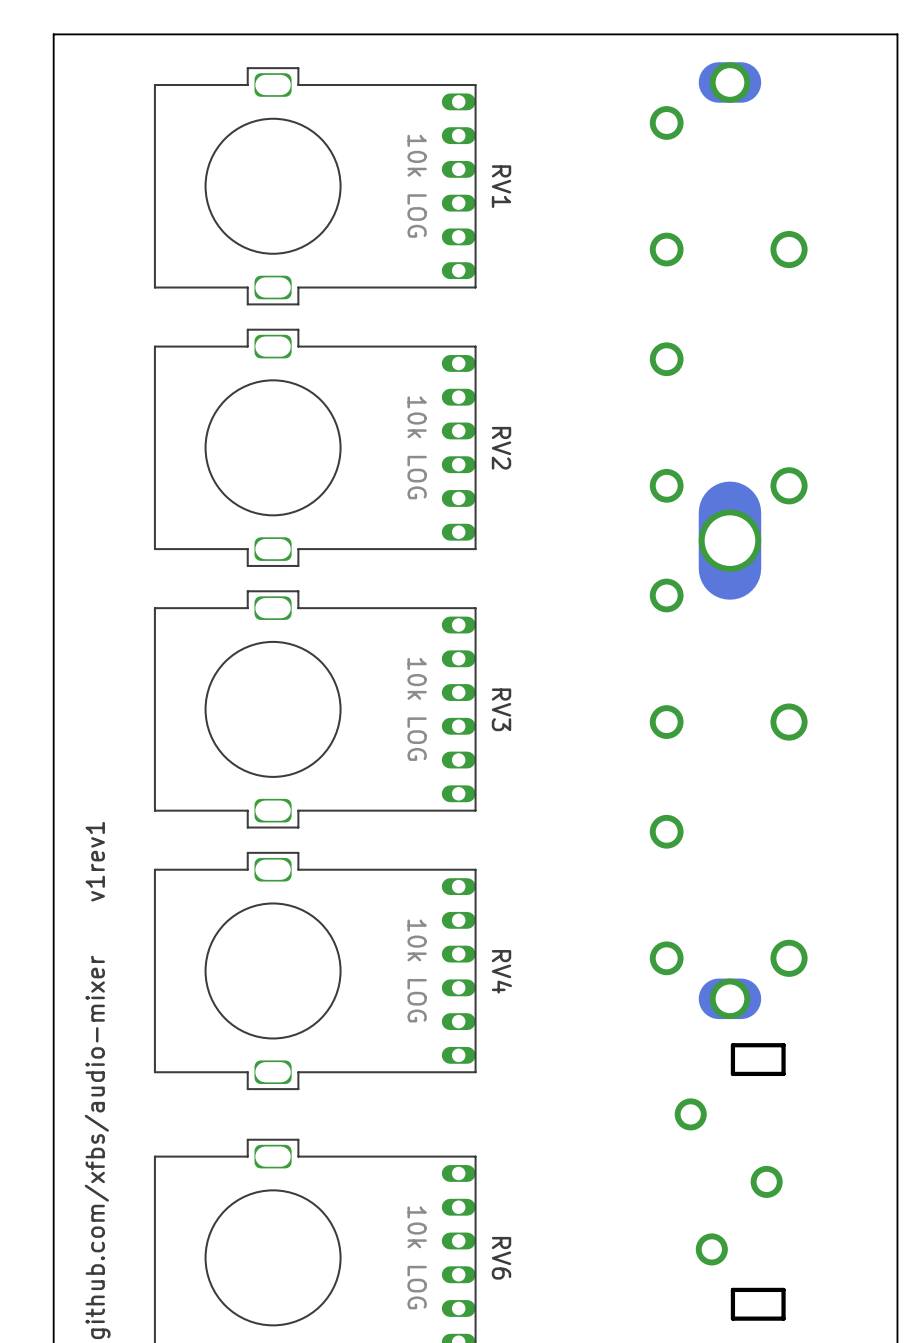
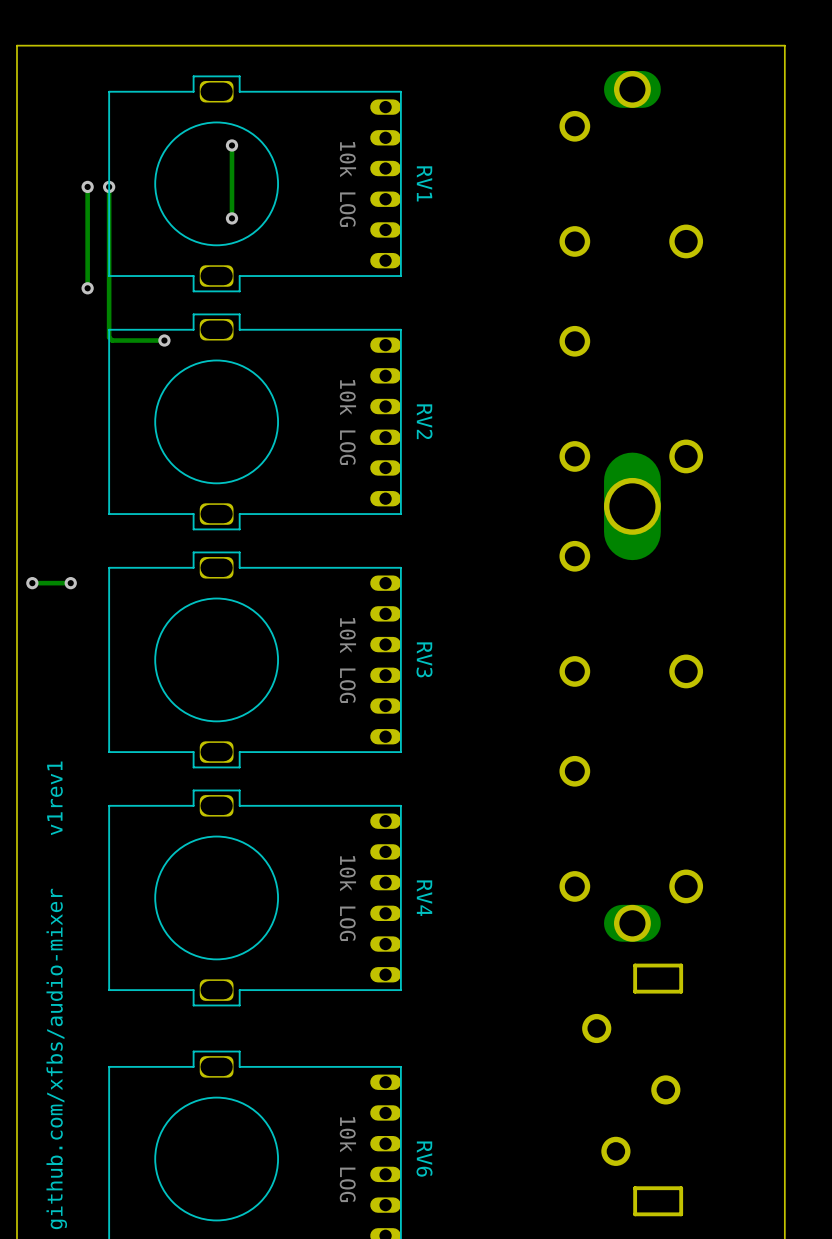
track: none -> (231, 145) (231, 218)
via: none -> (231, 145)
track: none -> (87, 186) (87, 288)
via: none -> (87, 186)
track: none -> (109, 186) (109, 337) (112, 340) (164, 340)
via: none -> (109, 186)
via: none -> (231, 218)
via: none -> (87, 288)
via: none -> (164, 340)
via: none -> (32, 583)
track: none -> (70, 583) (32, 583)
via: none -> (70, 583)

